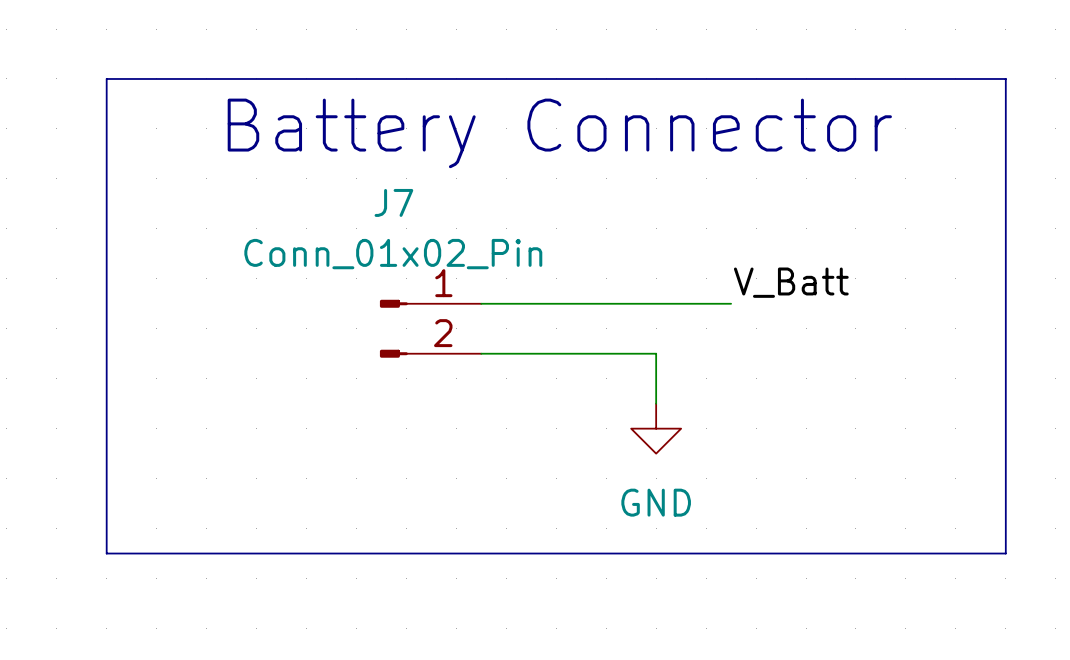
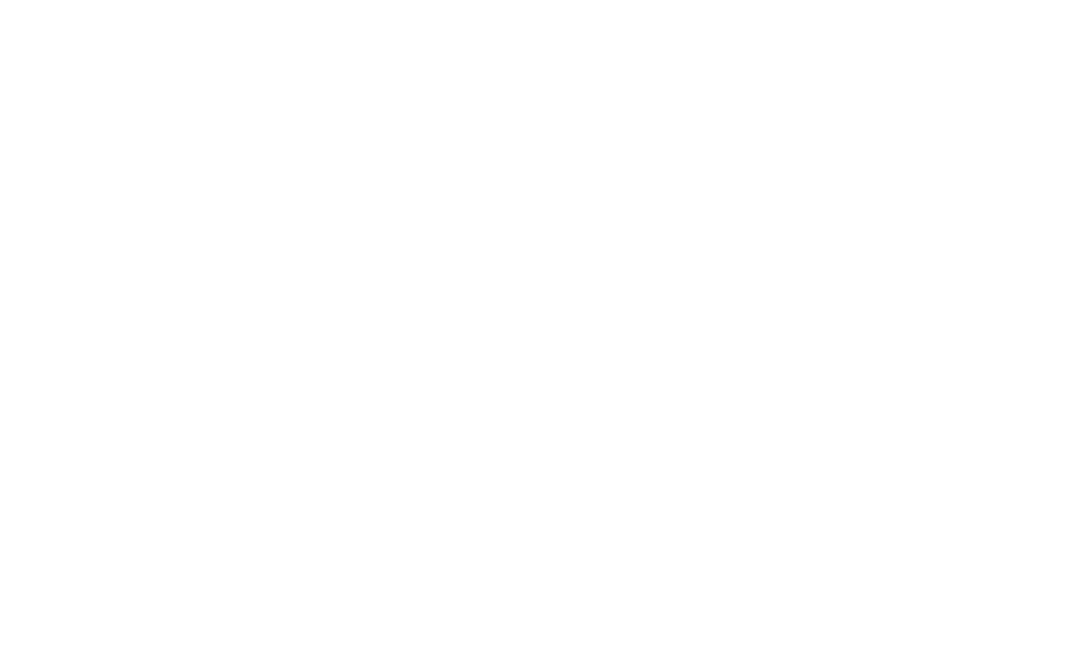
line: (106, 78) (1005, 78) (1005, 553) (106, 553) (106, 78) -> none
text: Battery Connector (559, 133) -> none
label: V_Batt (791, 282) -> none
wire: (481, 303) (731, 303) -> none
J7: Conn_01x02_Pin (430, 328) -> none
wire: (481, 353) (656, 353) (656, 403) -> none
power symbol: GND (656, 428) -> none

